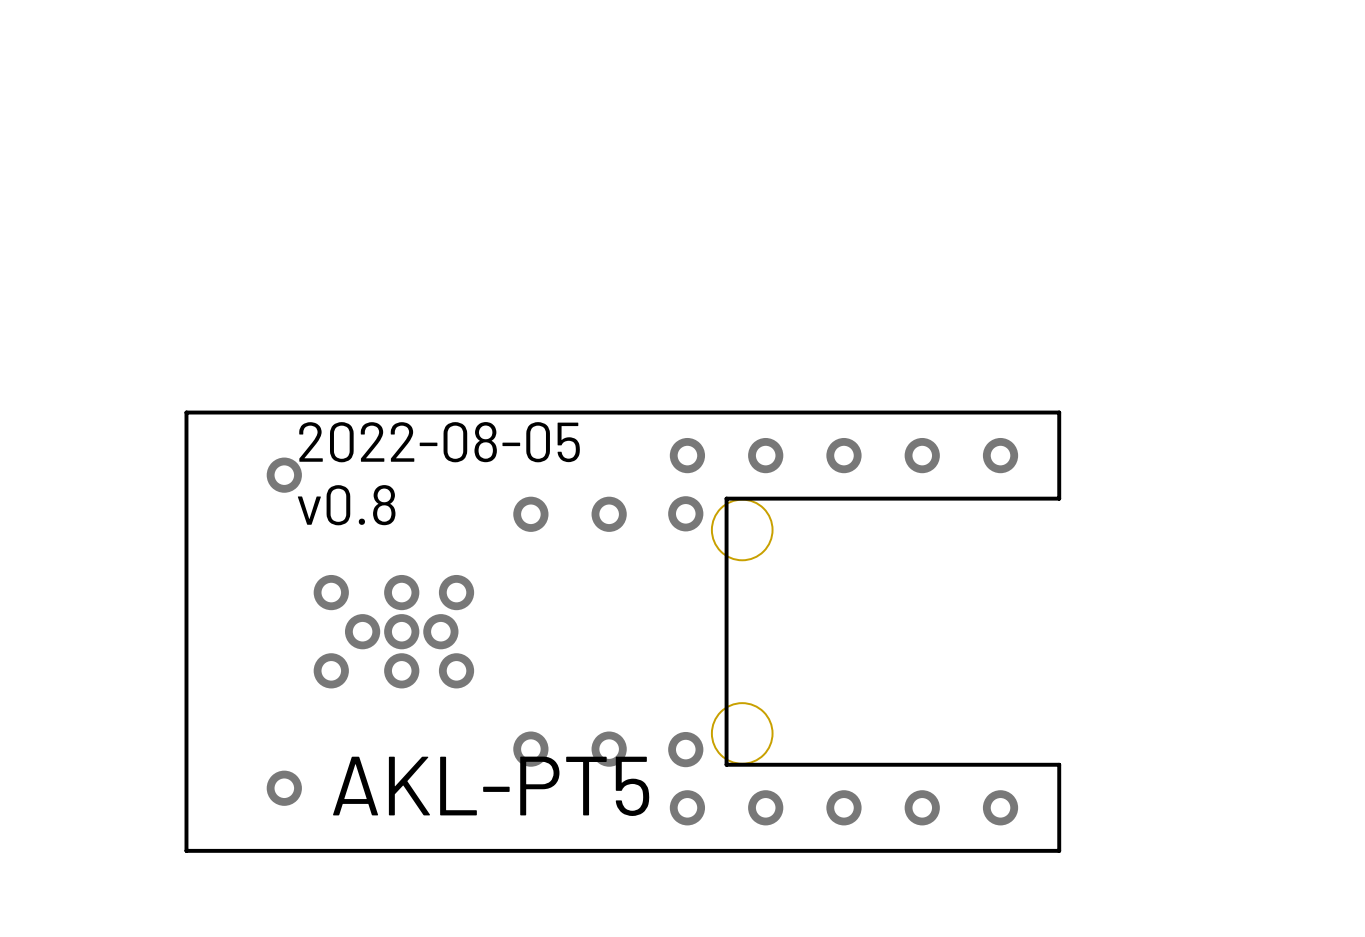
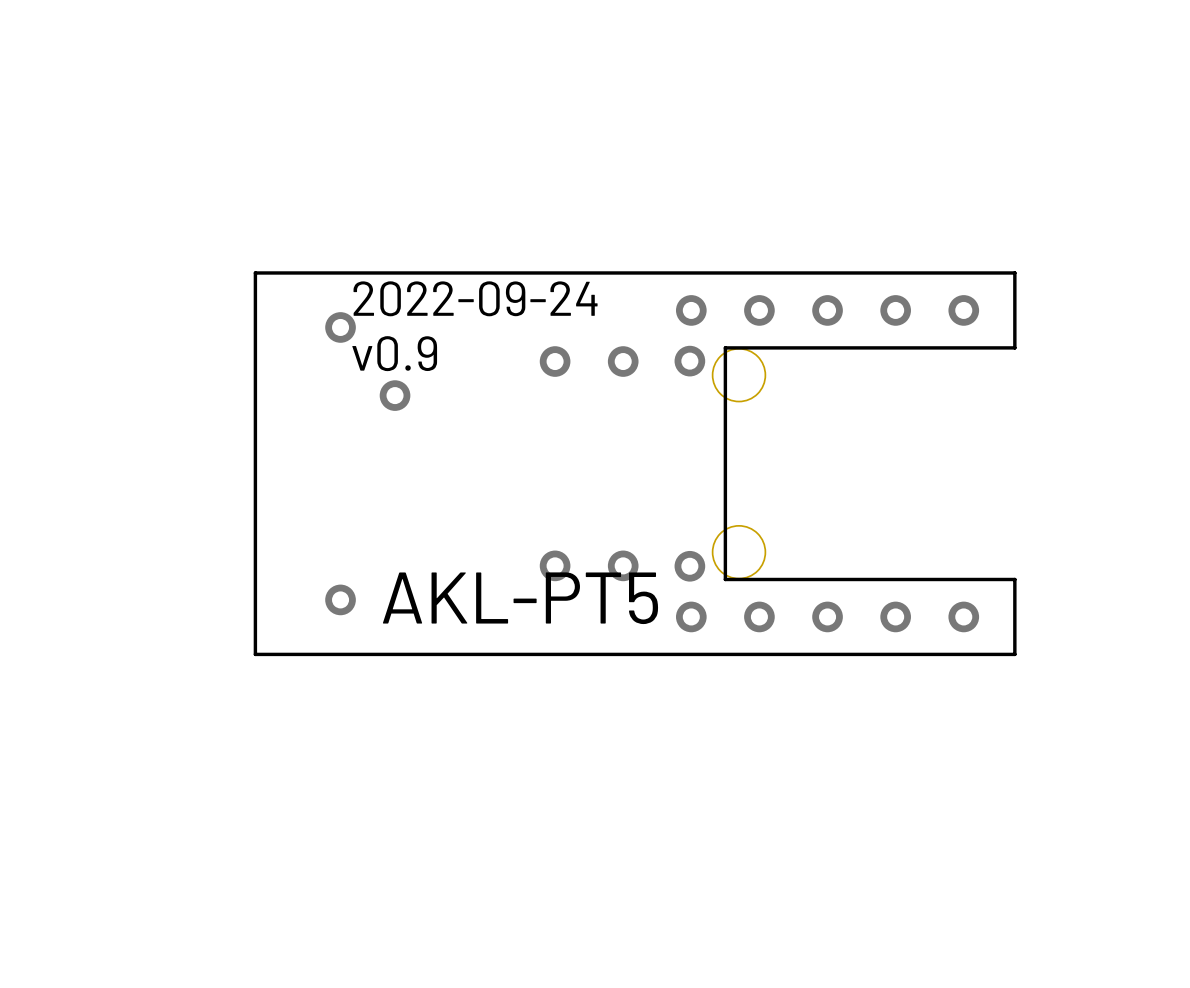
text: 2022-08-05 (439, 442) -> 2022-09-24 (475, 298)
text: v0.8 (346, 505) -> v0.9 (394, 353)
via: none -> (395, 395)
via: (331, 592) -> none
via: (401, 592) -> none
via: (456, 592) -> none
via: (362, 631) -> none
via: (401, 631) -> none
via: (440, 631) -> none
via: (331, 670) -> none
via: (401, 670) -> none
via: (456, 670) -> none

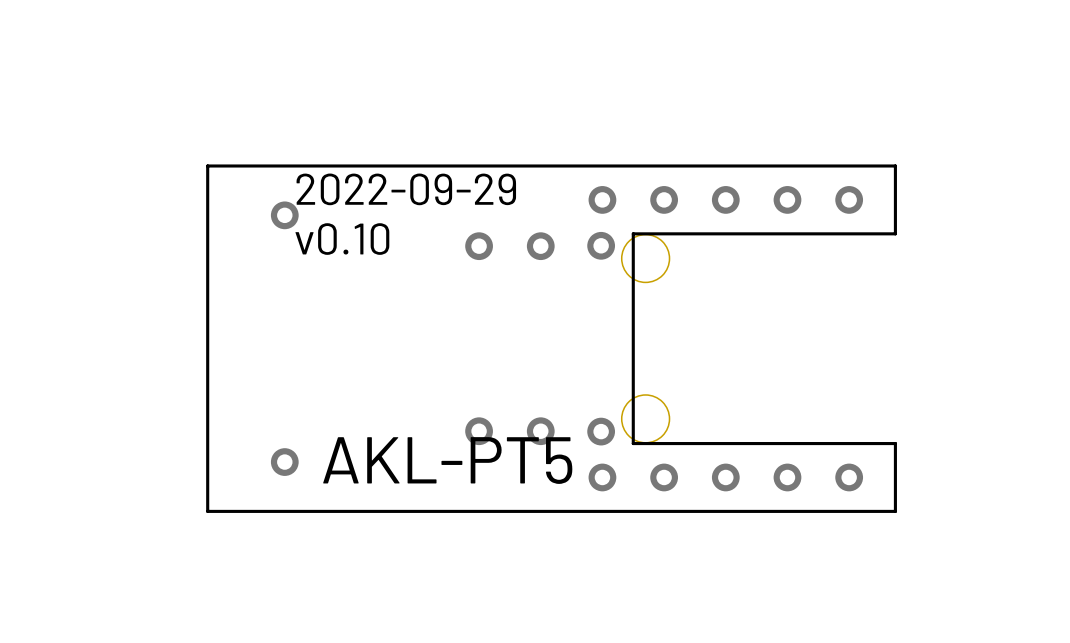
text: 2022-09-24 (475, 298) -> 2022-09-29 (406, 189)
text: v0.9 (394, 353) -> v0.10 (342, 239)
via: (395, 395) -> none

